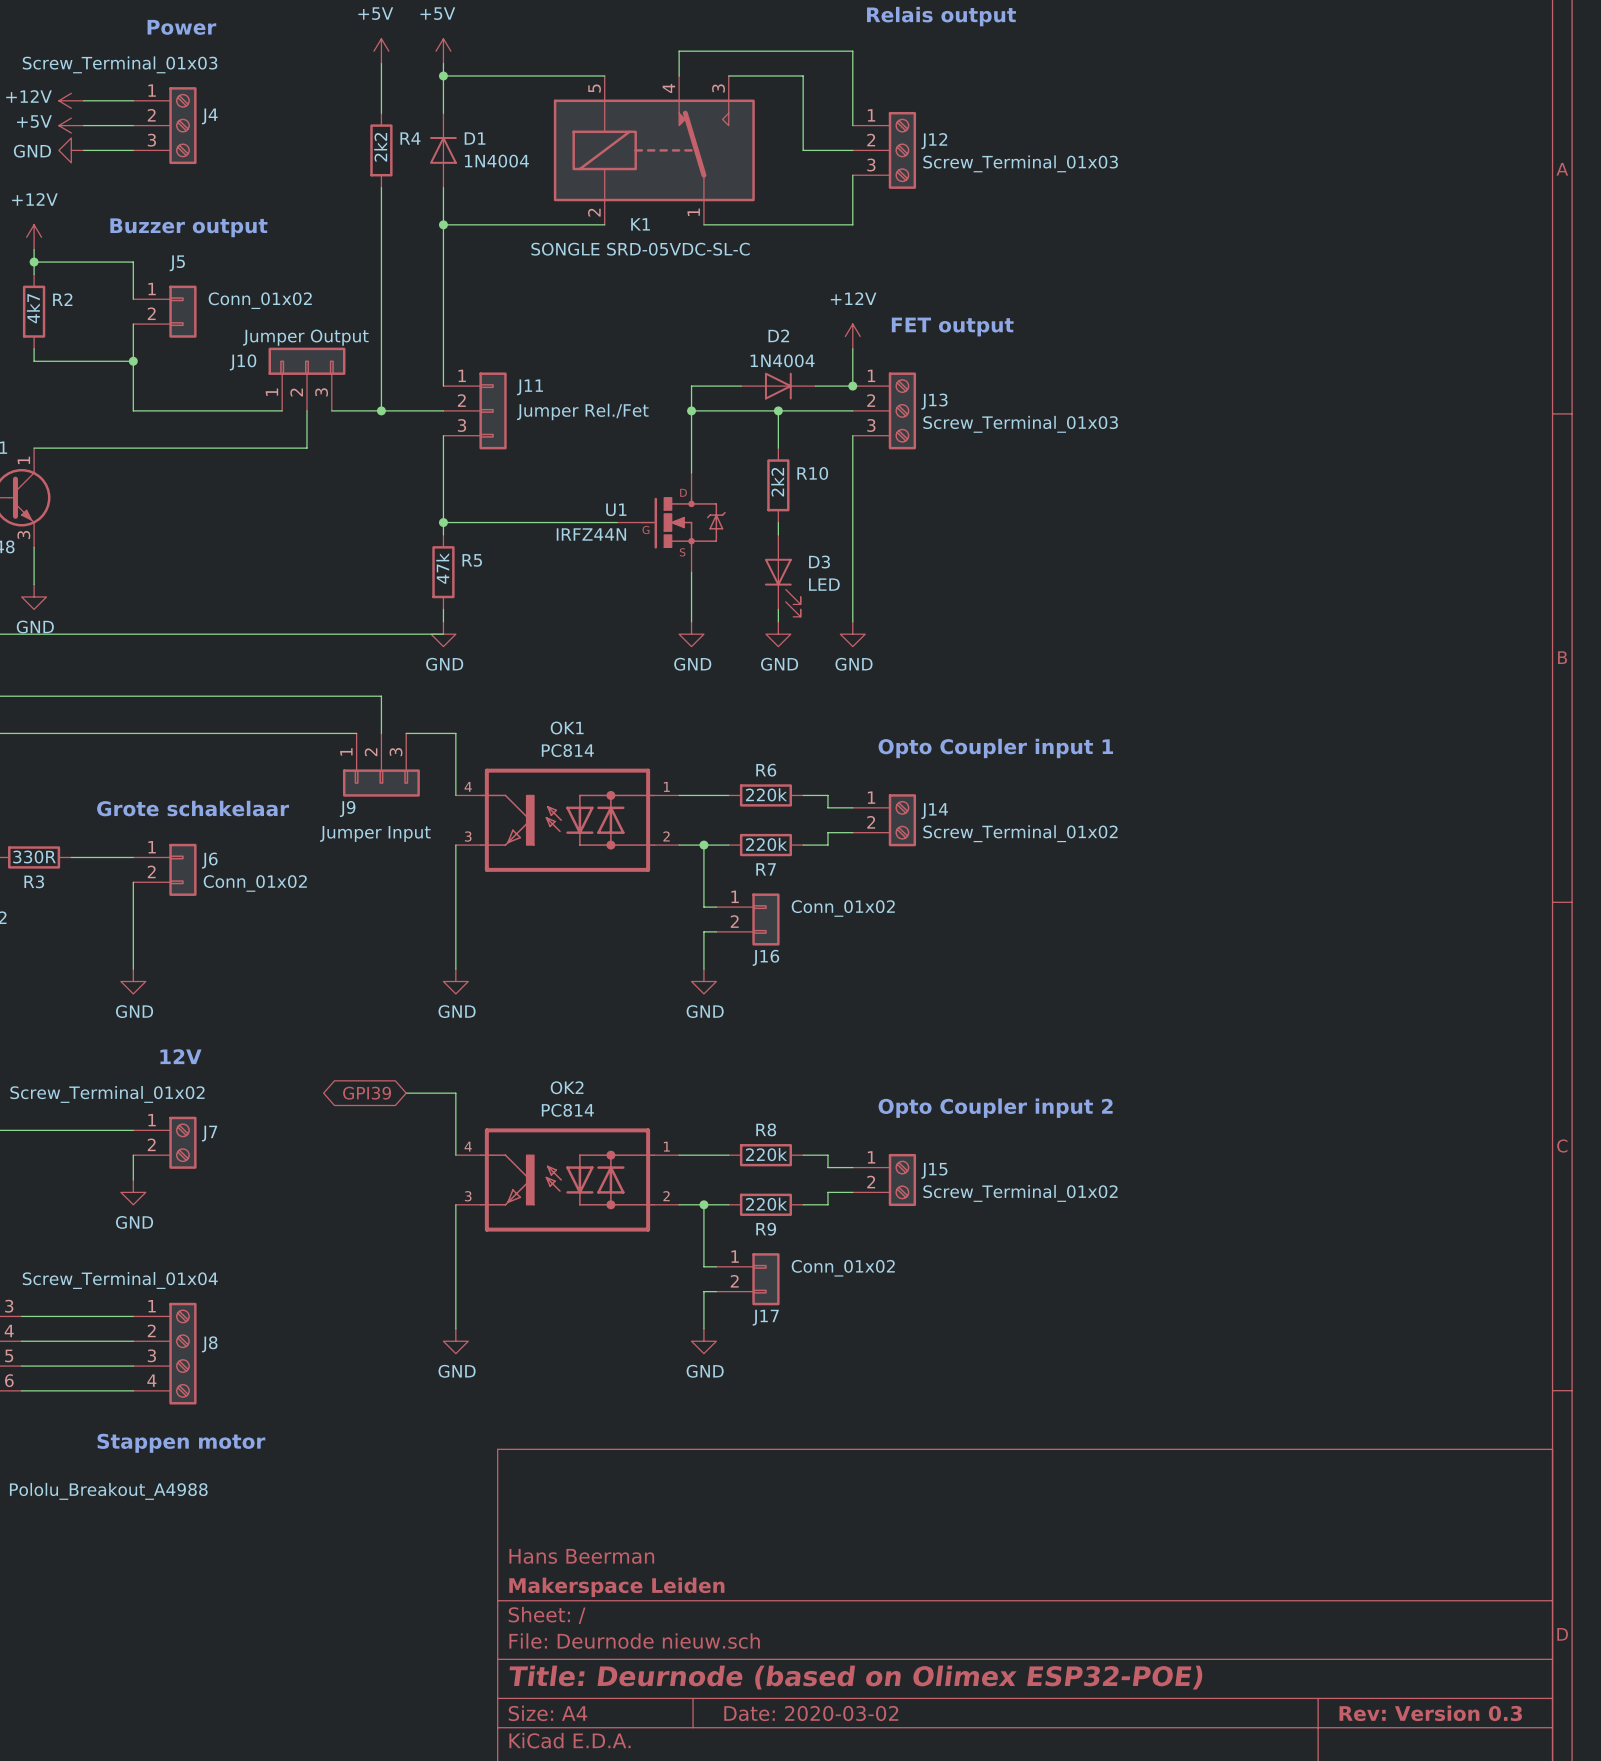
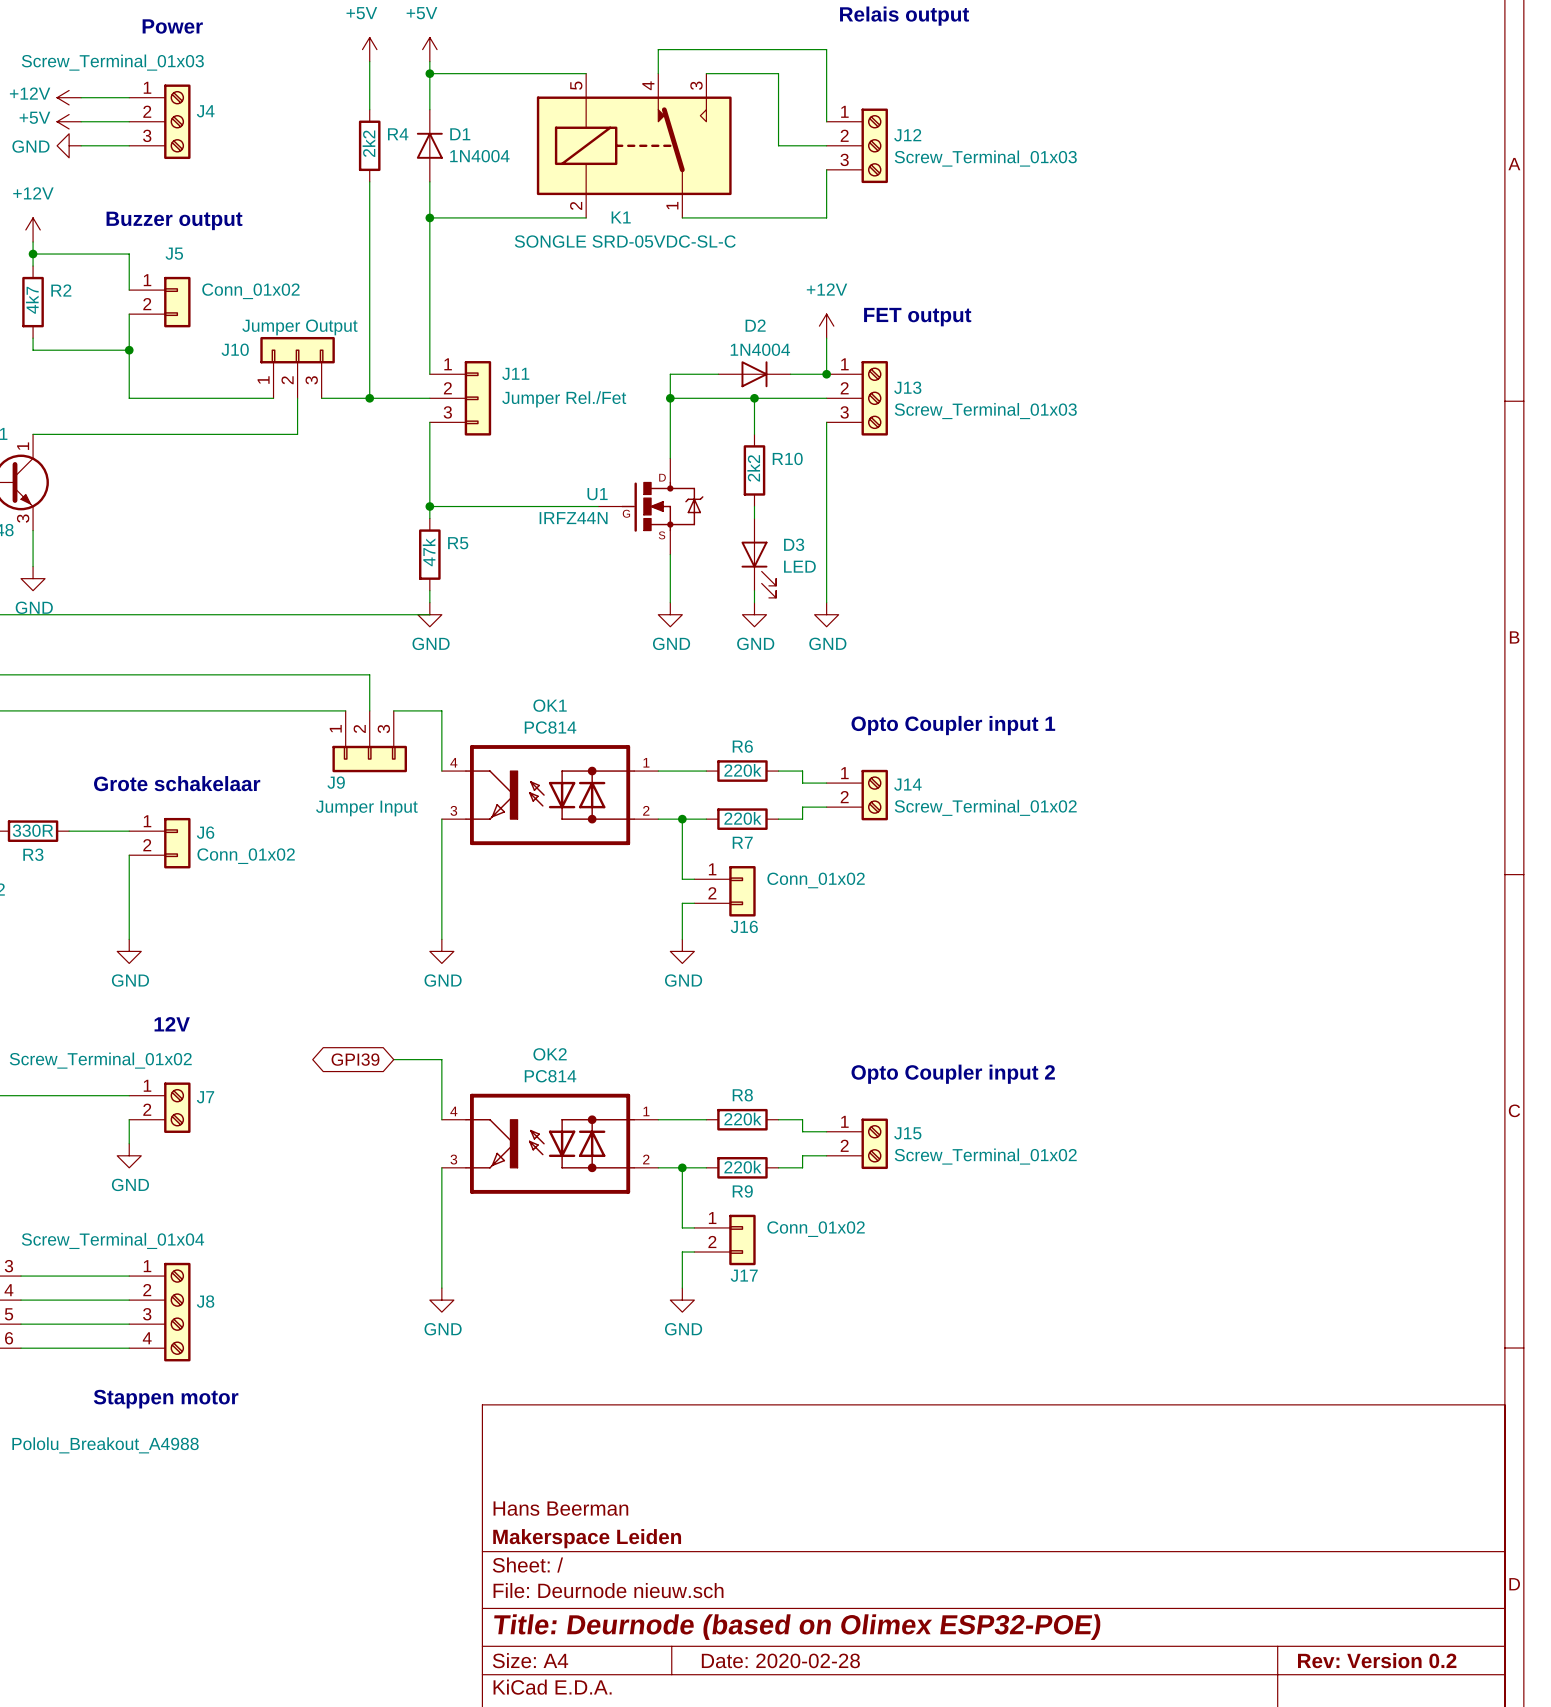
title block: Date: 2020-03-02 (811, 1713) -> Date: 2020-02-28 (780, 1660)
title block: Rev: Version 0.3 (1430, 1713) -> Rev: Version 0.2 (1377, 1660)

